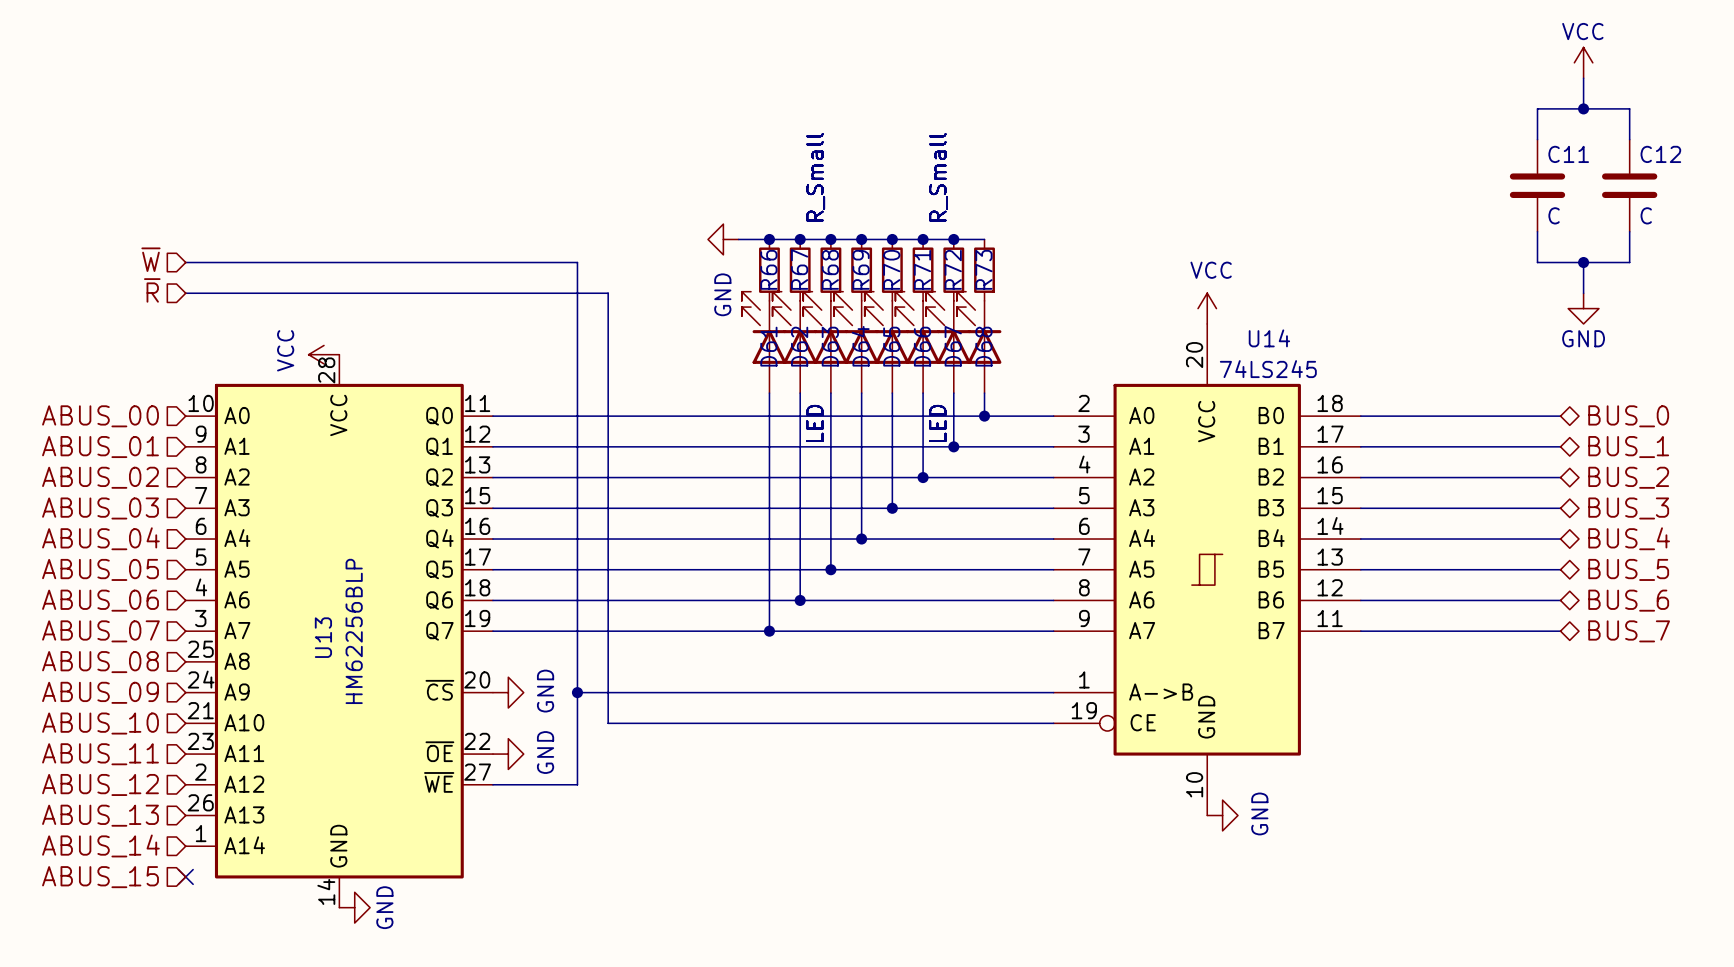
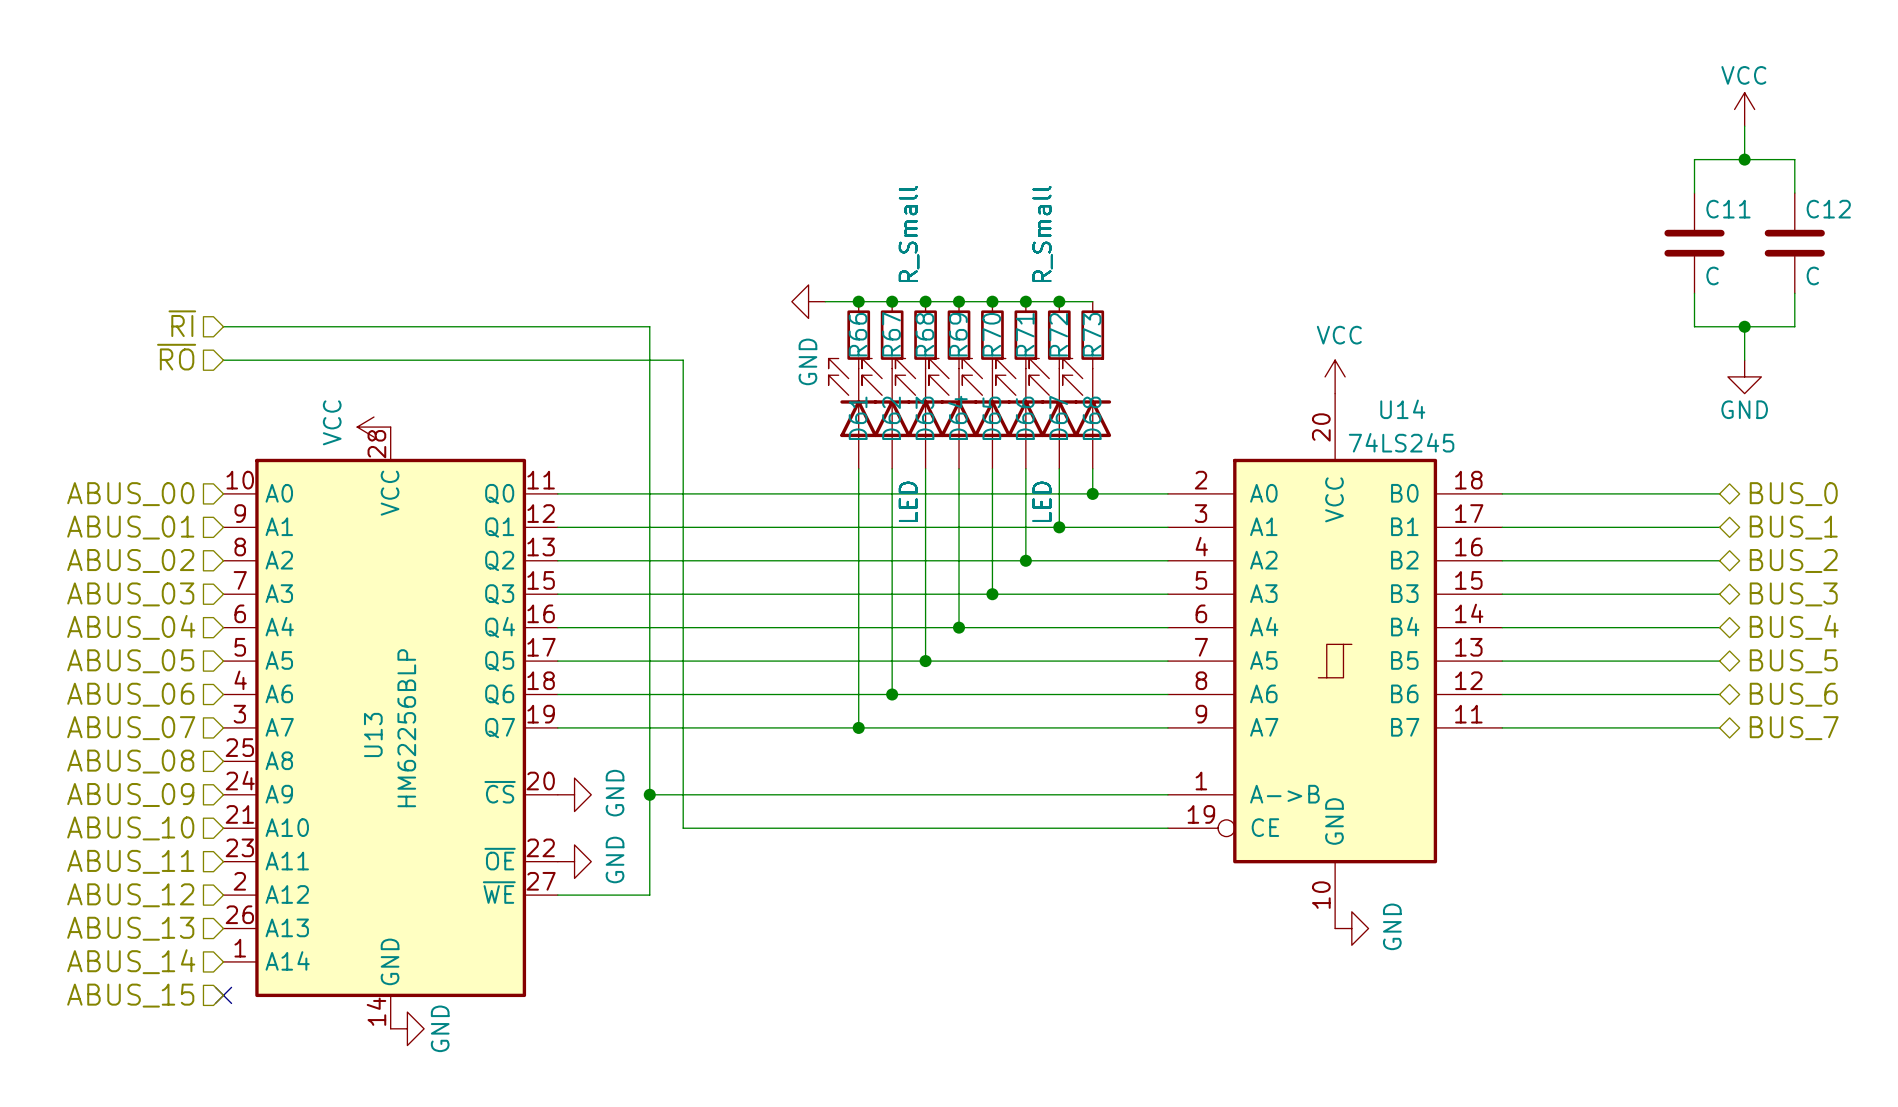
hierarchical label: ~{W} (150, 259) -> ~{RI} (182, 323)
hierarchical label: ~{R} (152, 290) -> ~{RO} (176, 357)

